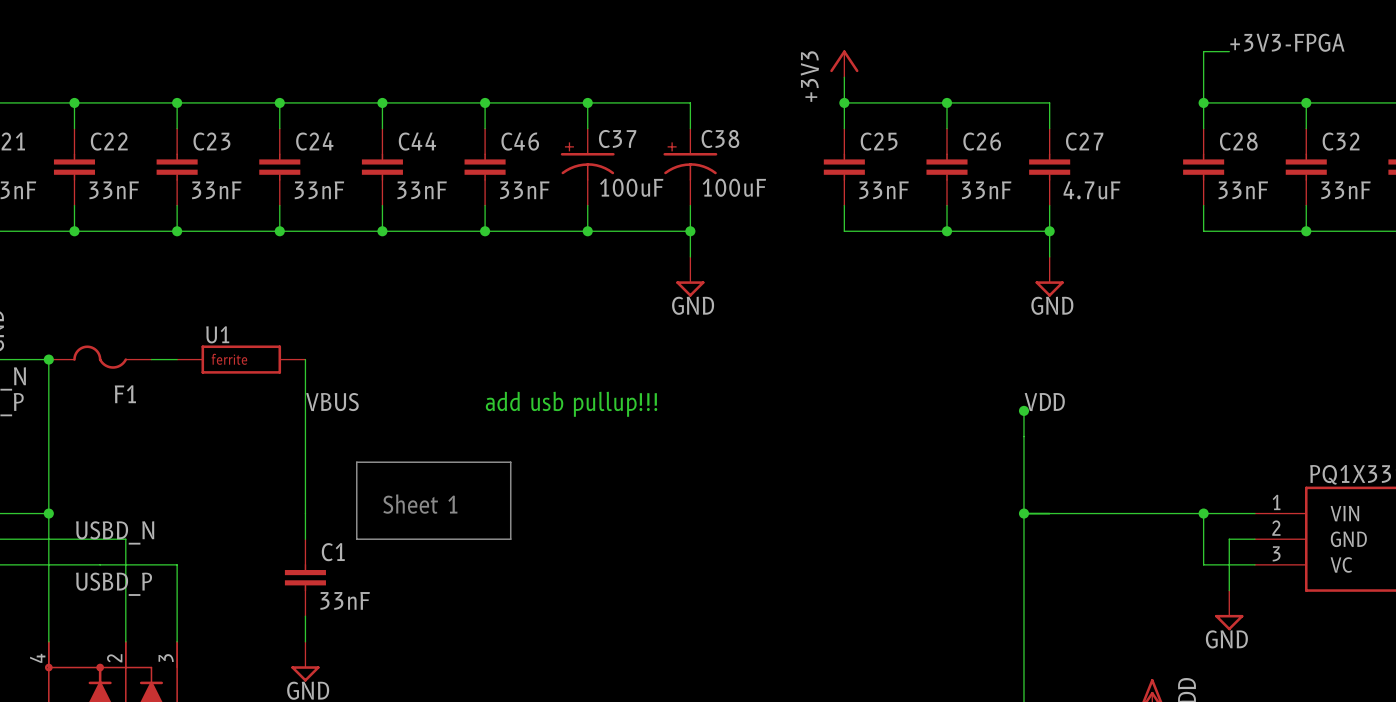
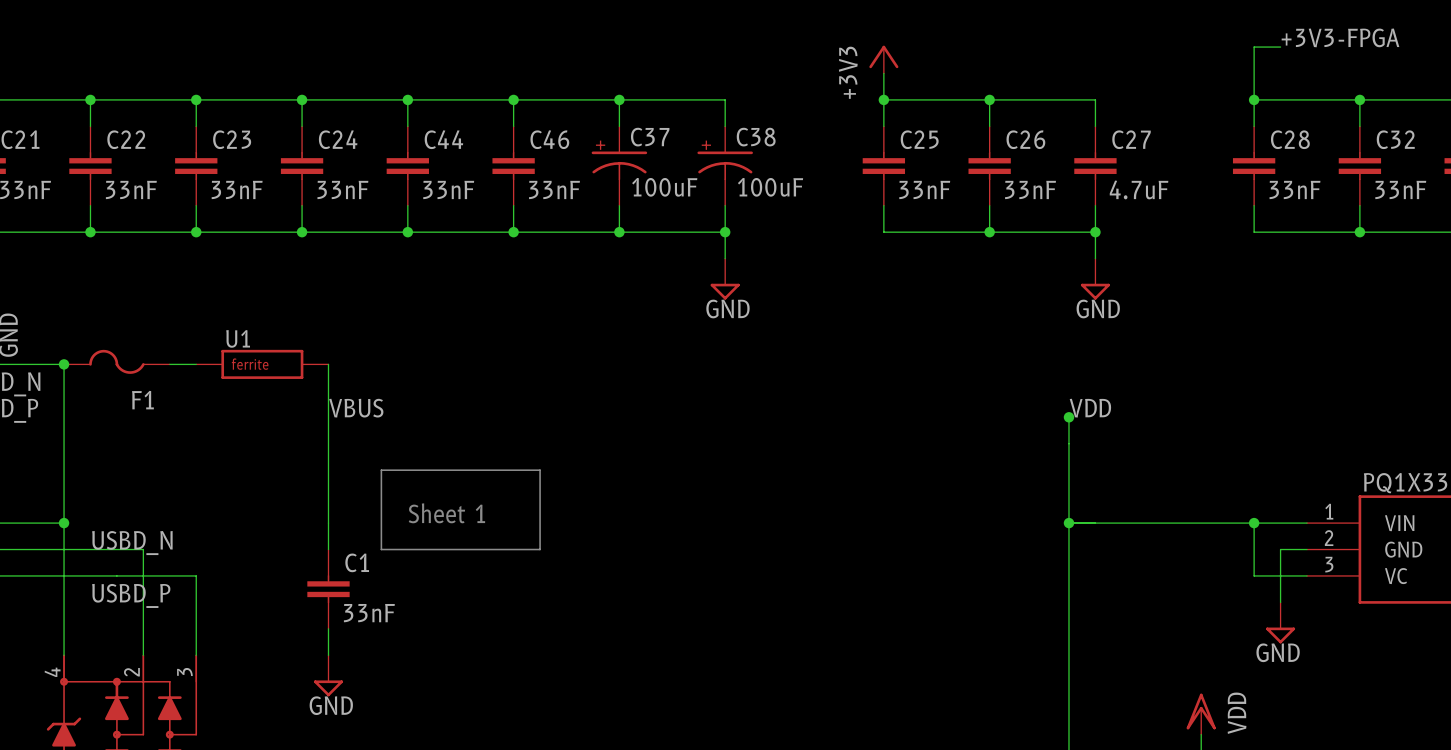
text: add usb pullup!!! (571, 404) -> none

